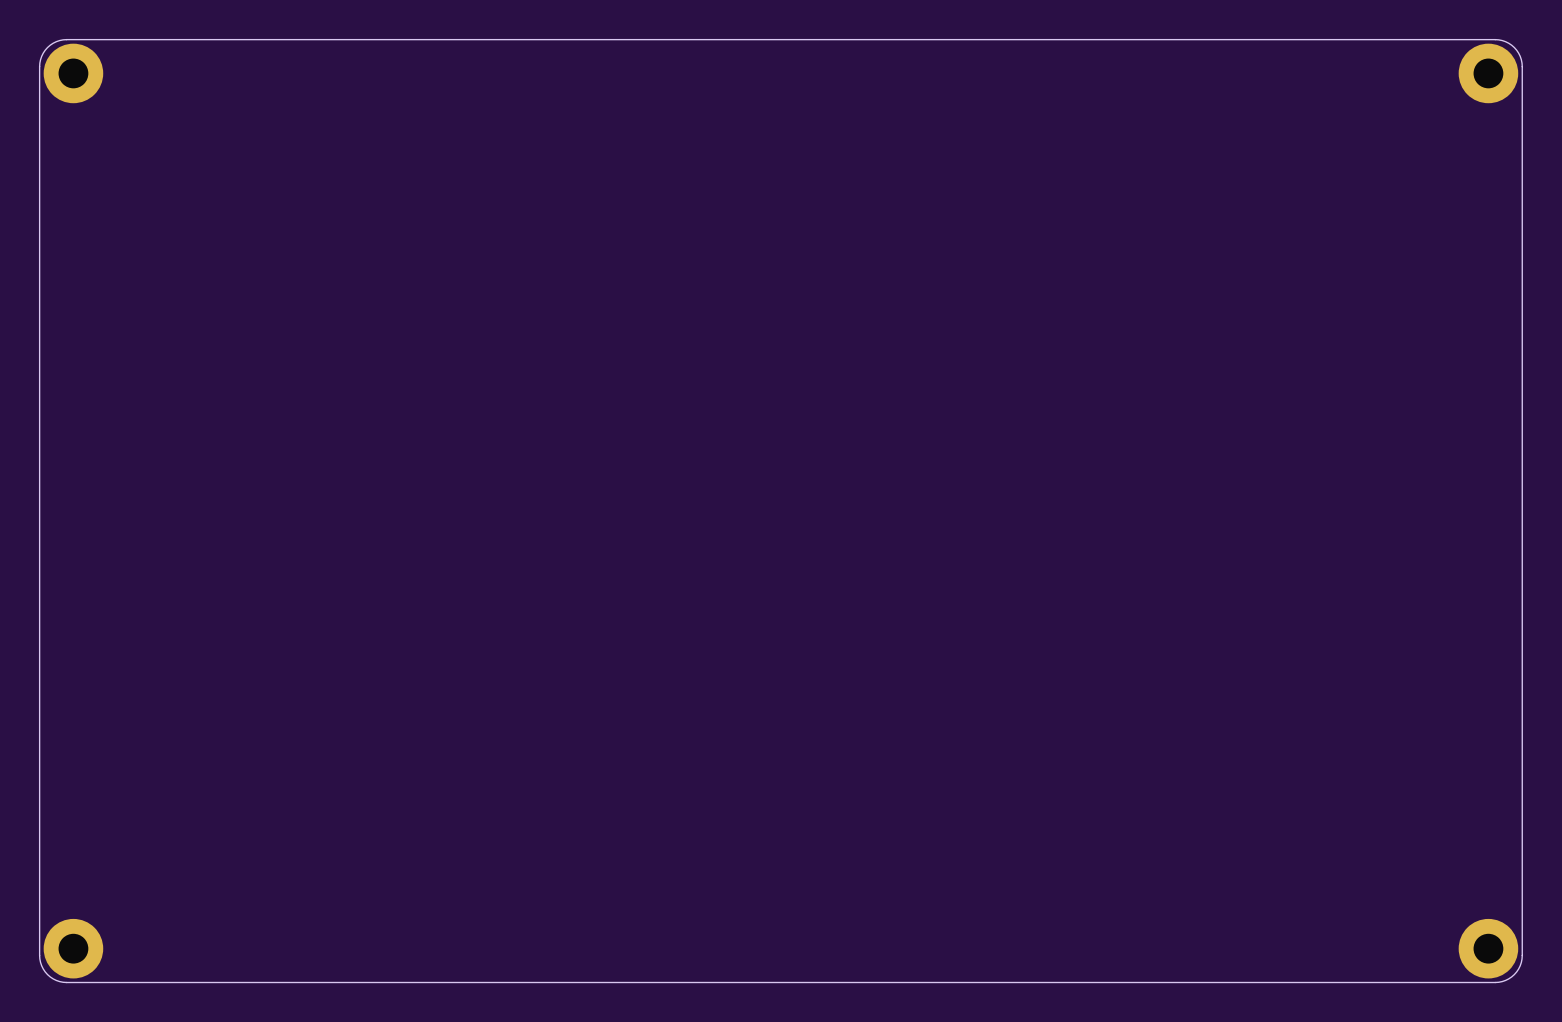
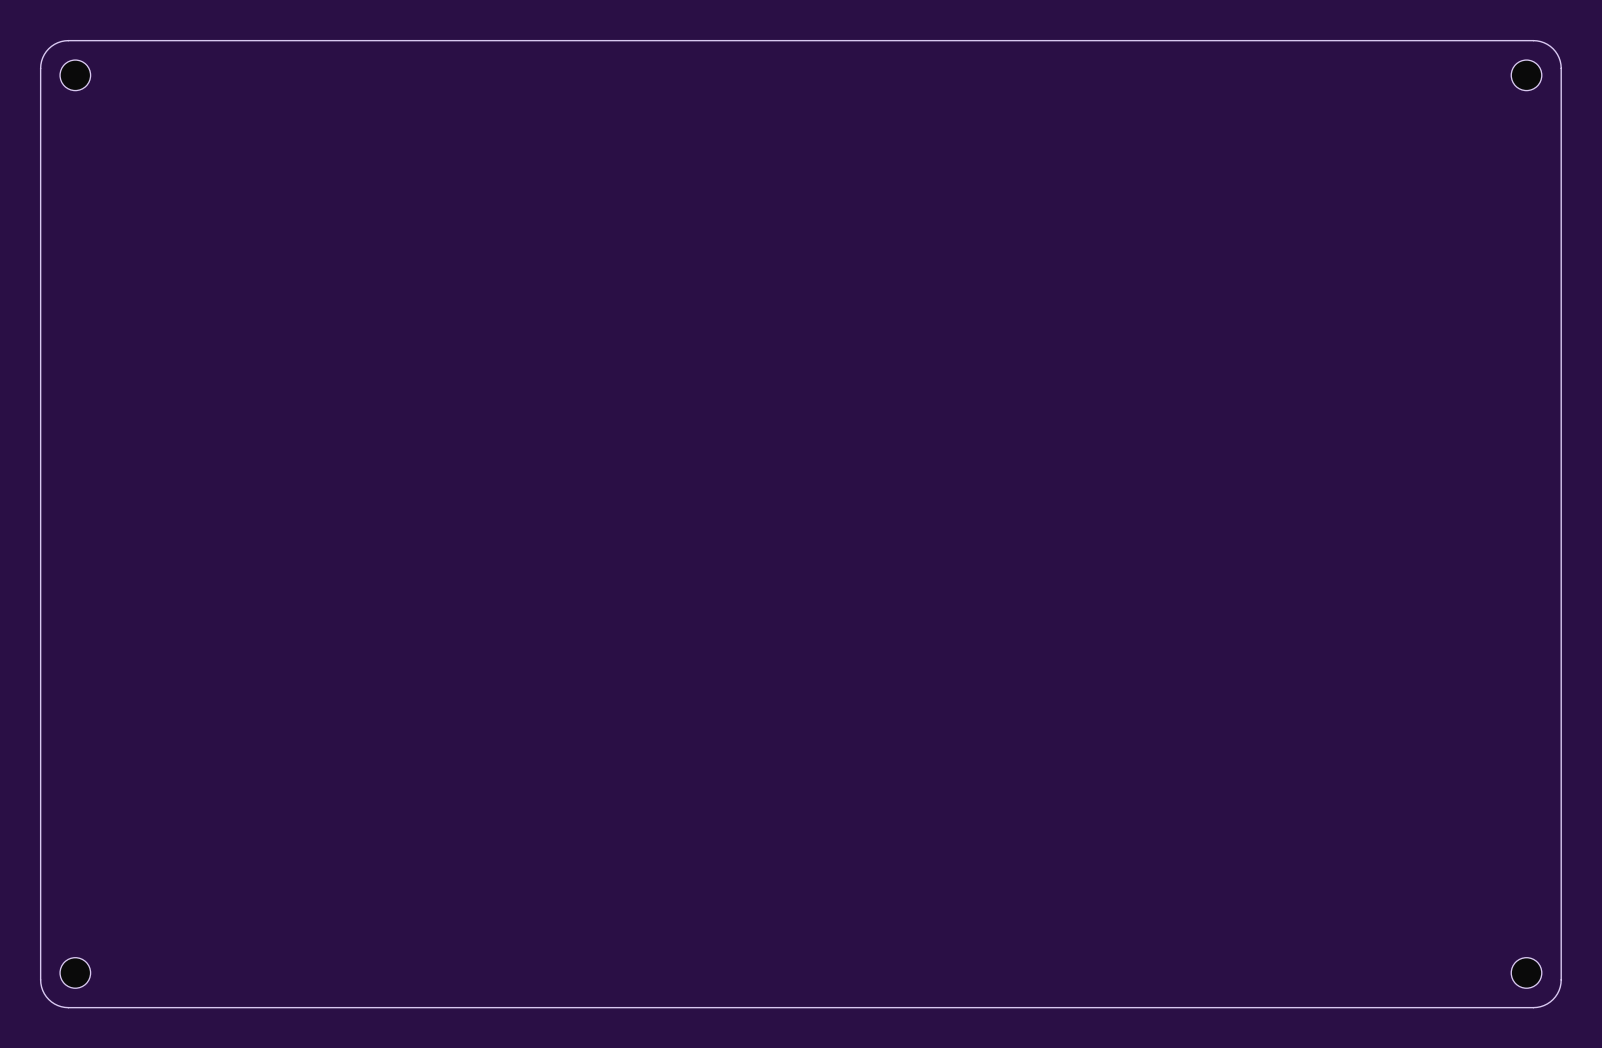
part footprint: [43, 43, 104, 104] -> [60, 60, 91, 91]
part footprint: [1458, 43, 1519, 104] -> [1511, 60, 1542, 91]
part footprint: [43, 918, 104, 979] -> [60, 957, 91, 989]
part footprint: [1458, 918, 1519, 979] -> [1511, 957, 1542, 989]

